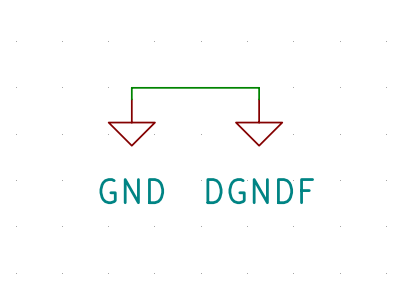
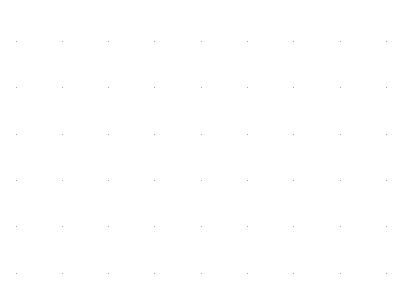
wire: (131, 99) (131, 87) (259, 87) (259, 99) -> none
power symbol: GND (131, 122) -> none
power symbol: DGNDF (259, 122) -> none

